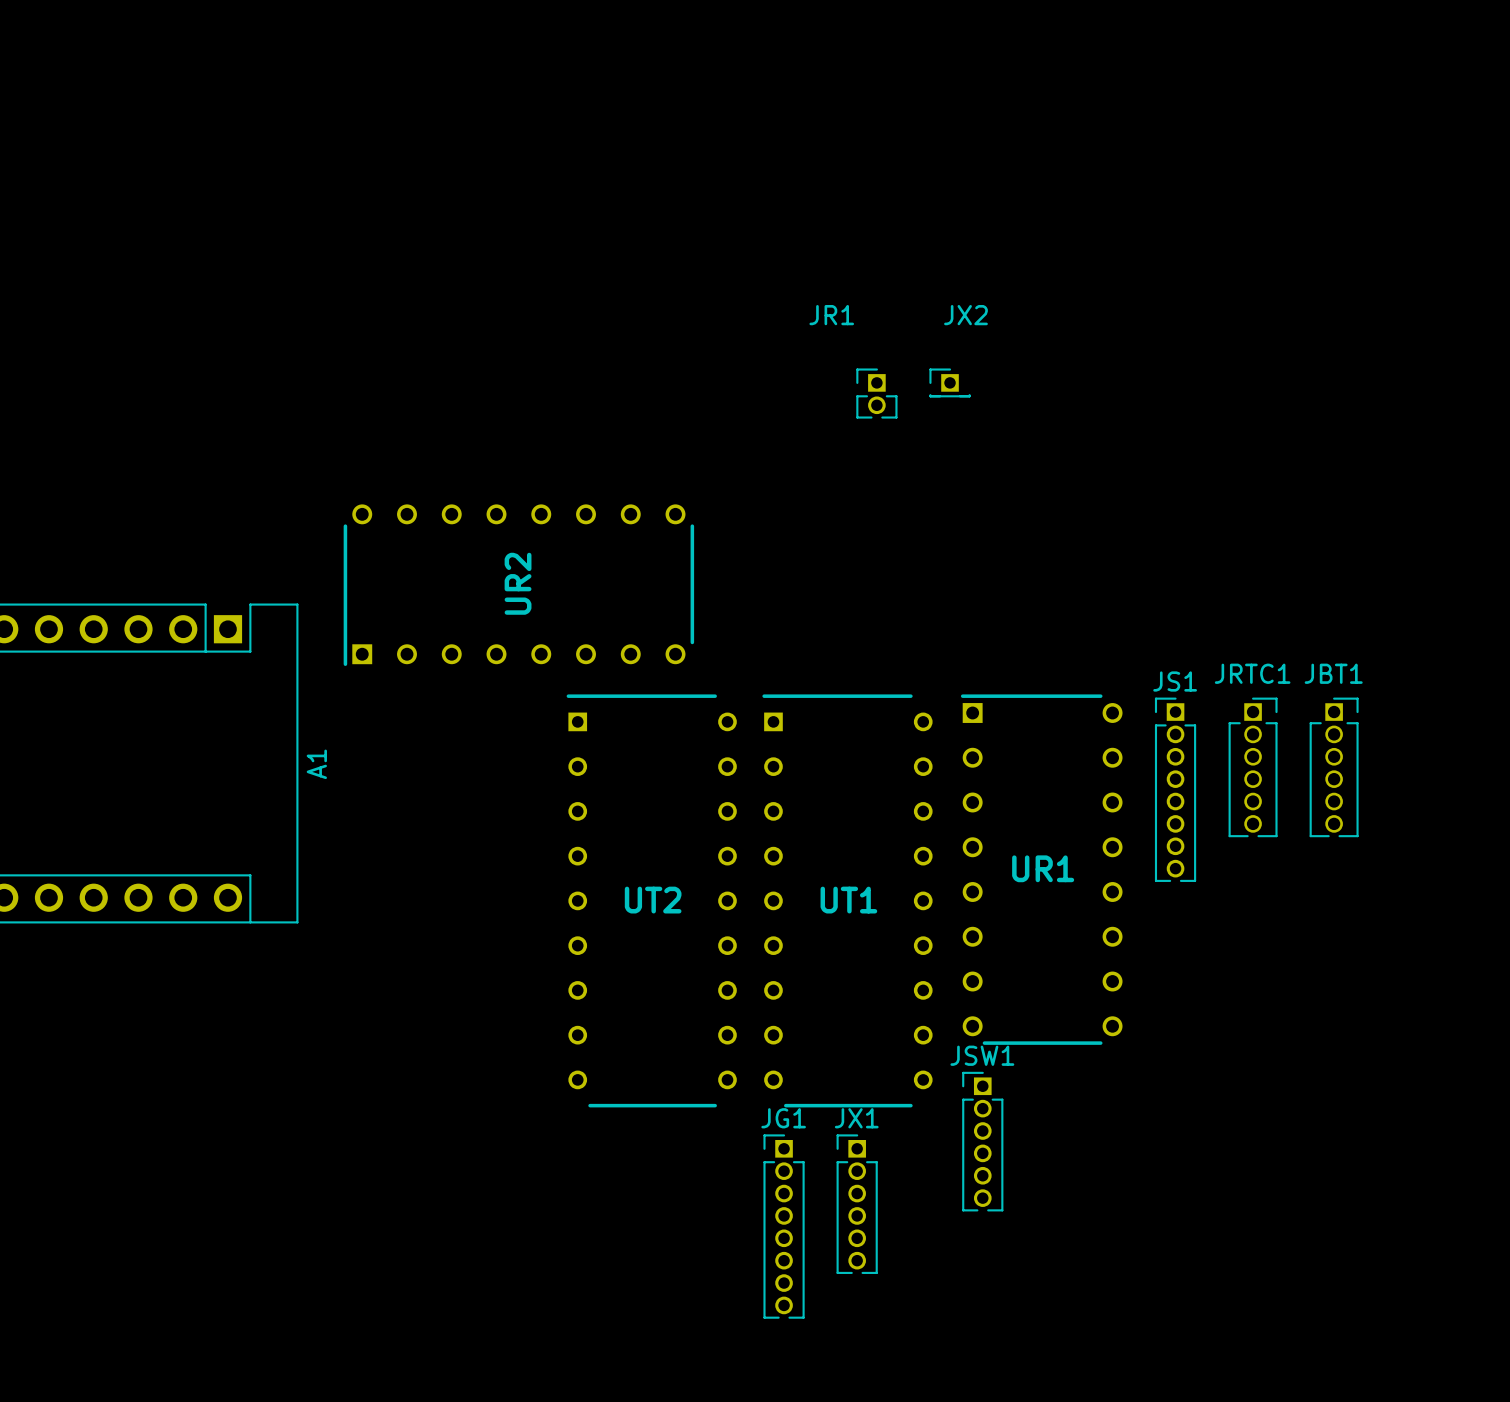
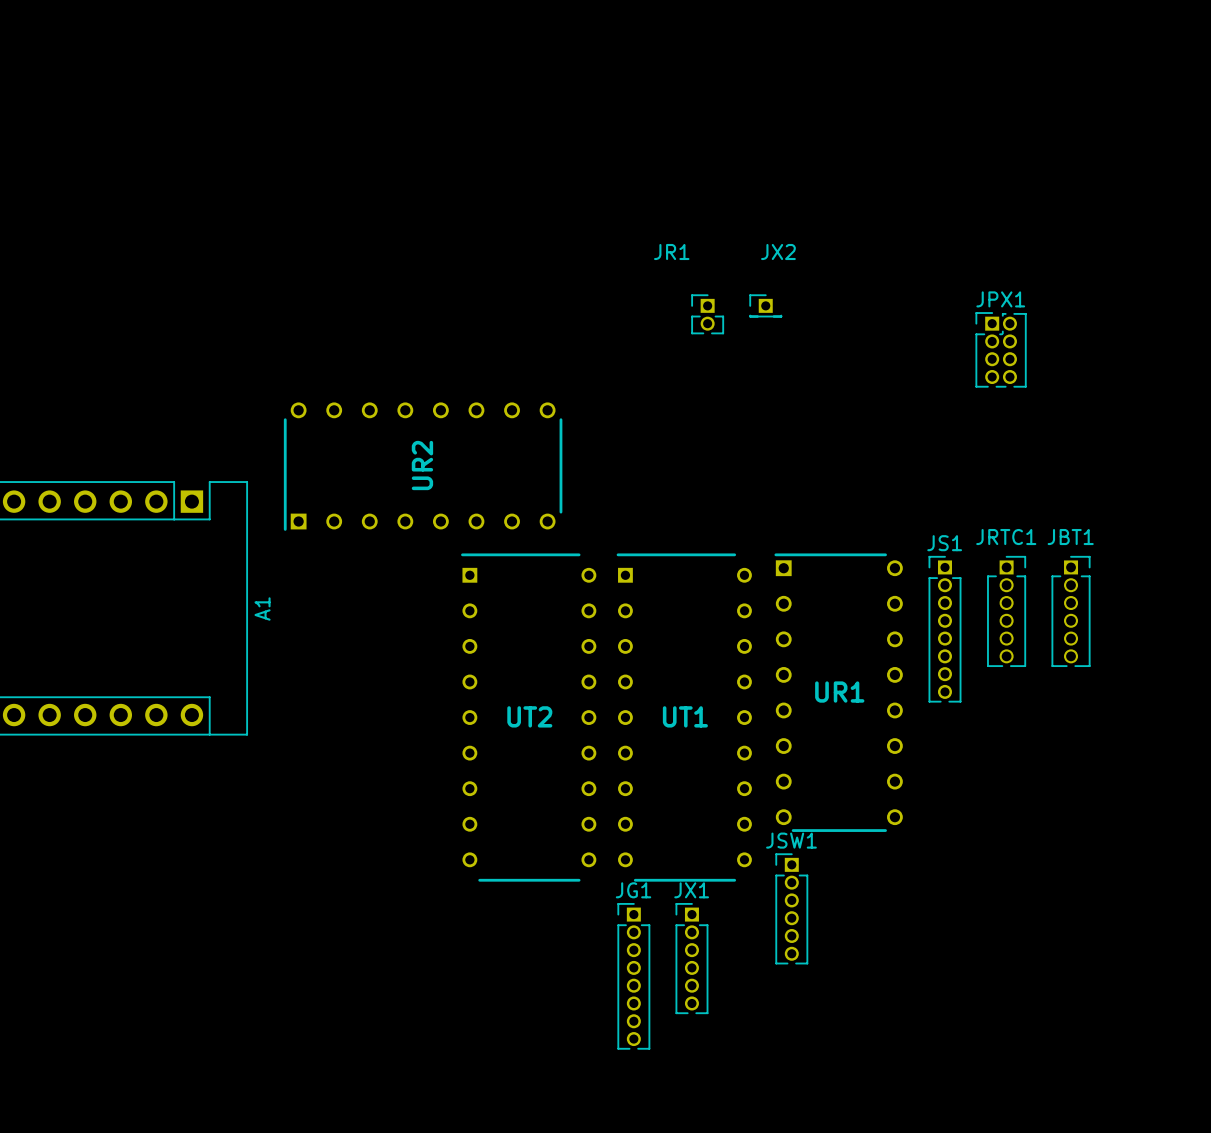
JPX1: none -> (1001, 349)

